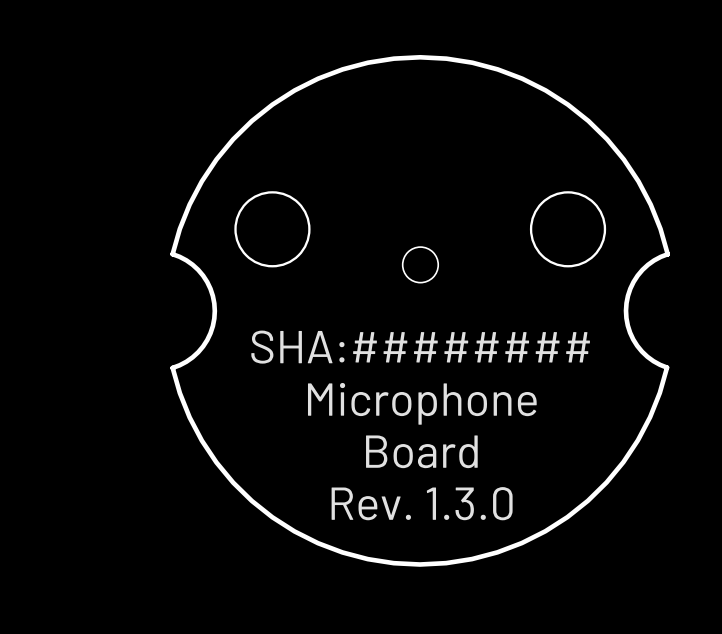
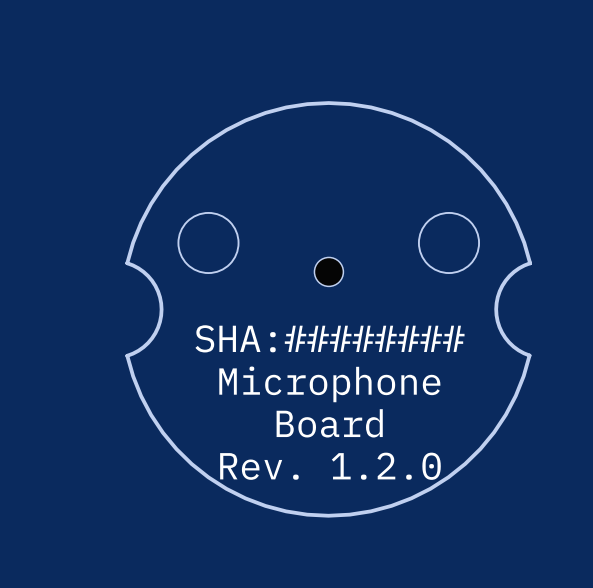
text: Rev. 1.3.0 (422, 503) -> Rev. 1.2.0 (330, 466)

